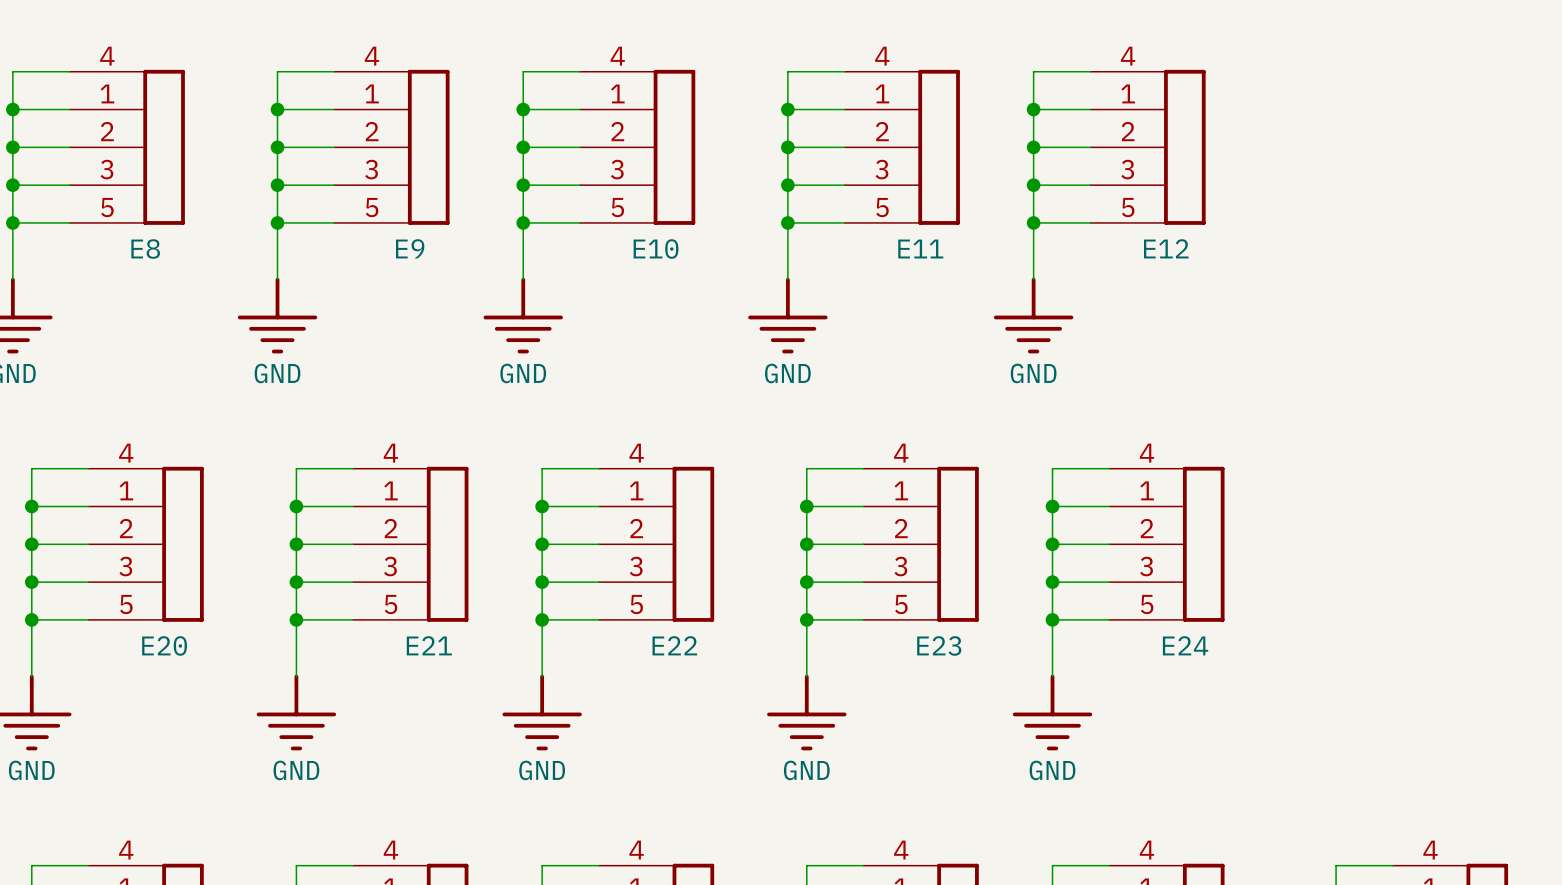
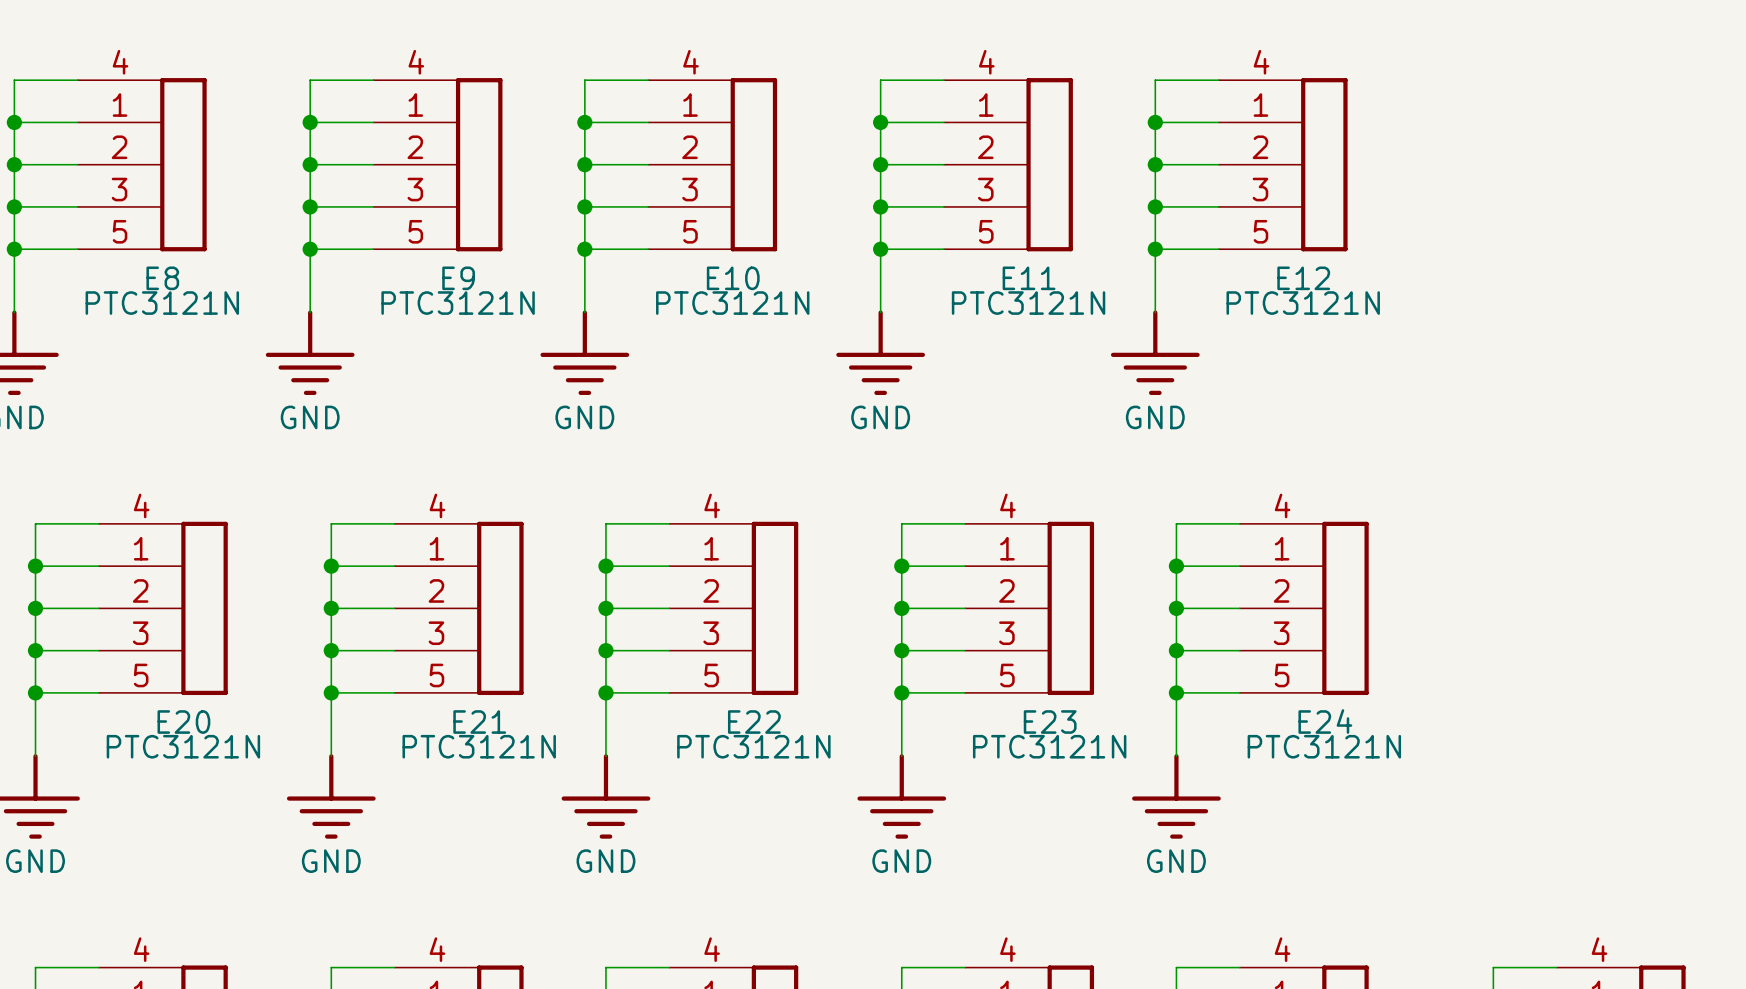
E8 value: none -> PTC3121N (162, 303)
E9 value: none -> PTC3121N (458, 303)
E10 value: none -> PTC3121N (732, 303)
E11 value: none -> PTC3121N (1028, 303)
E12 value: none -> PTC3121N (1303, 303)
E20 value: none -> PTC3121N (183, 746)
E21 value: none -> PTC3121N (479, 746)
E22 value: none -> PTC3121N (753, 746)
E23 value: none -> PTC3121N (1049, 746)
E24 value: none -> PTC3121N (1324, 746)

